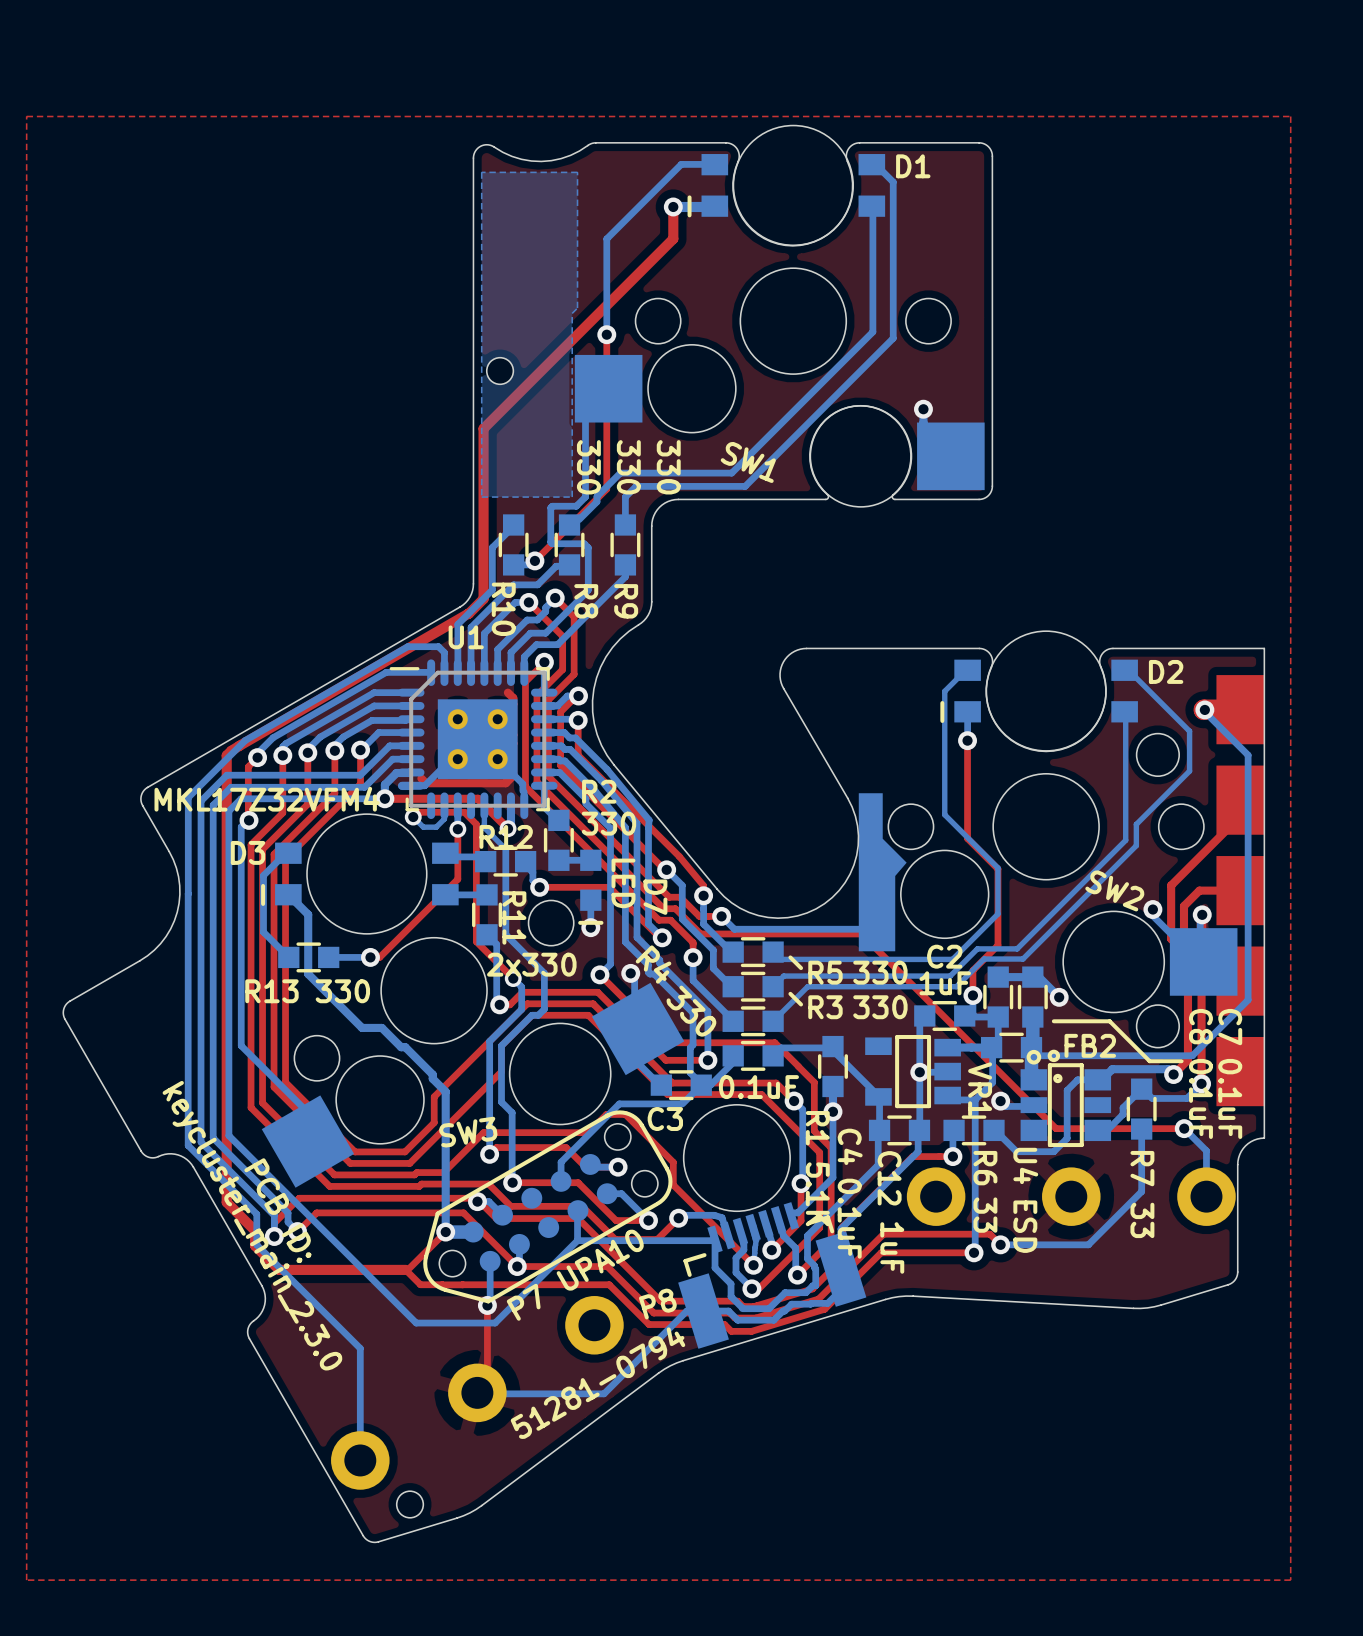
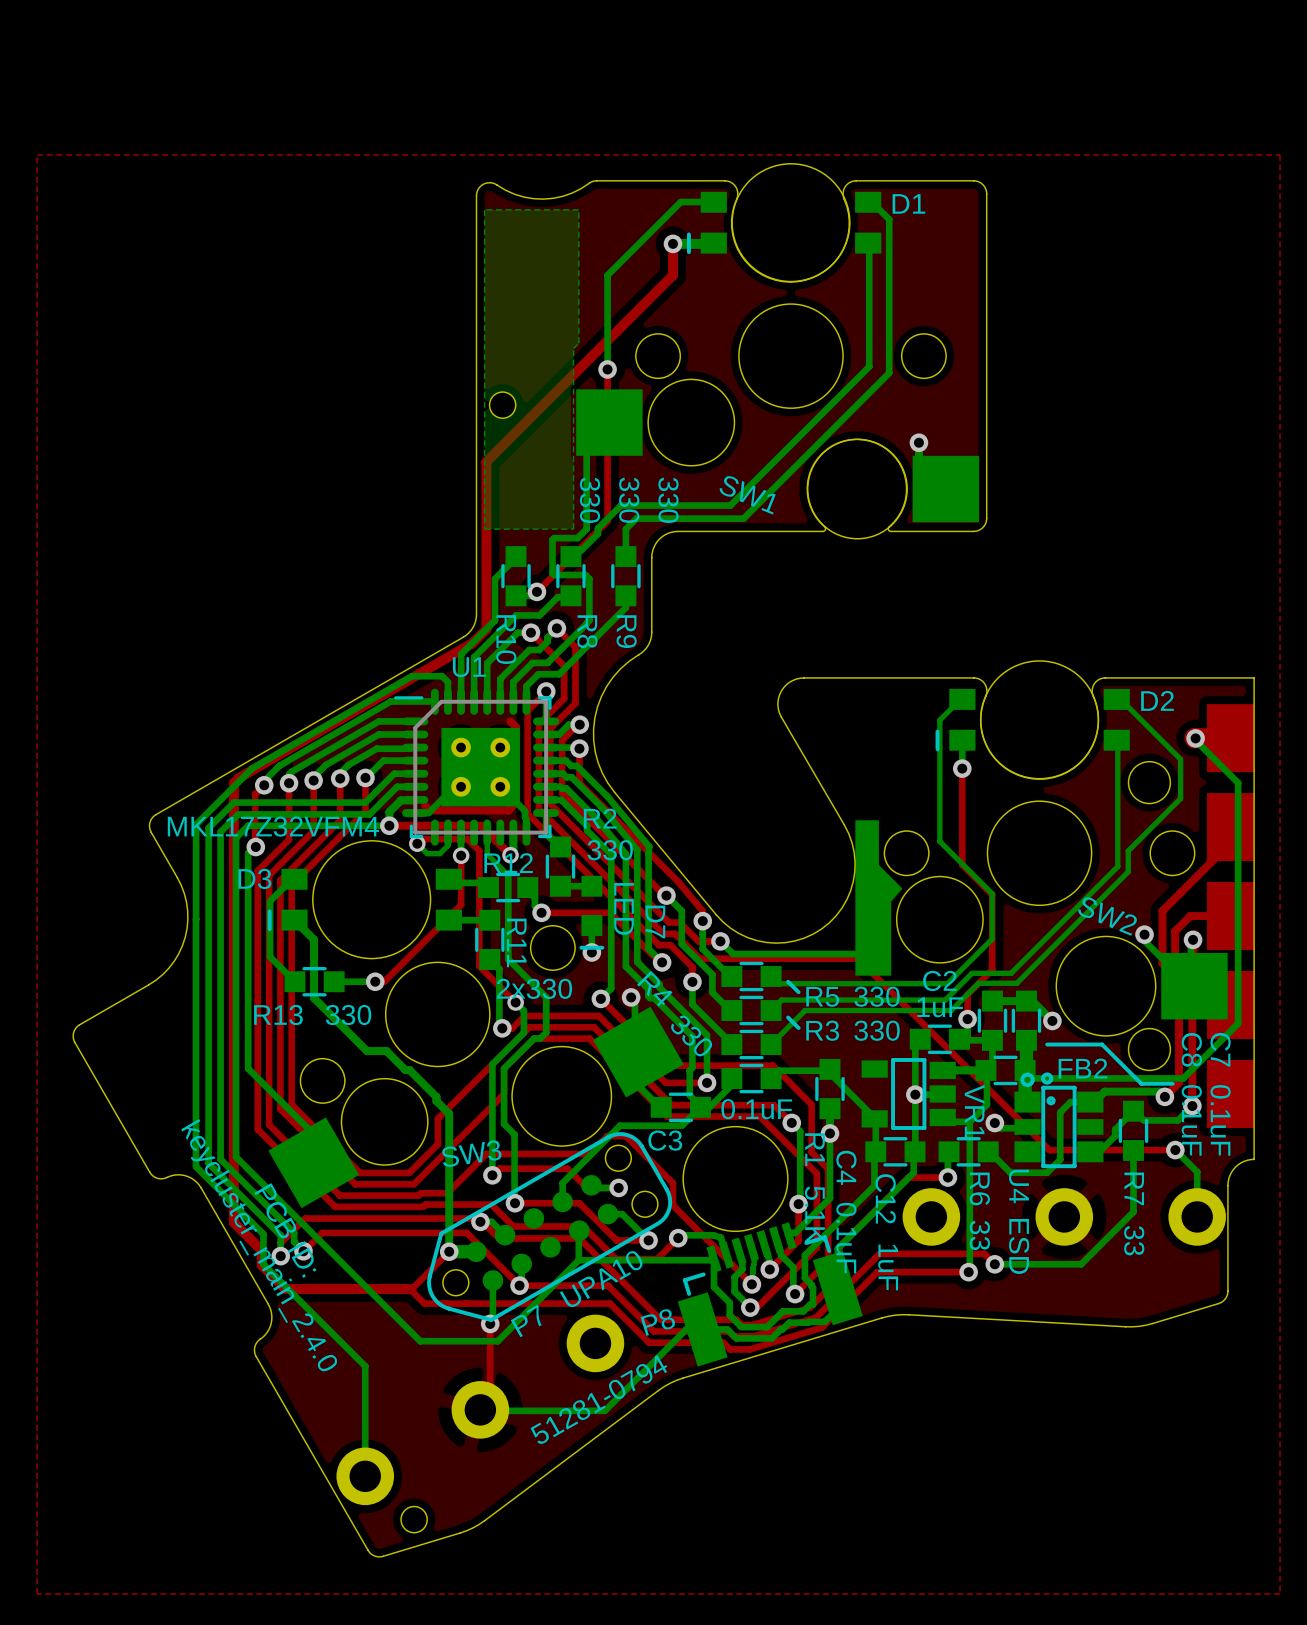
text: keycluster_main_2.3.0 (252, 1225) -> keycluster_main_2.4.0 (259, 1245)

